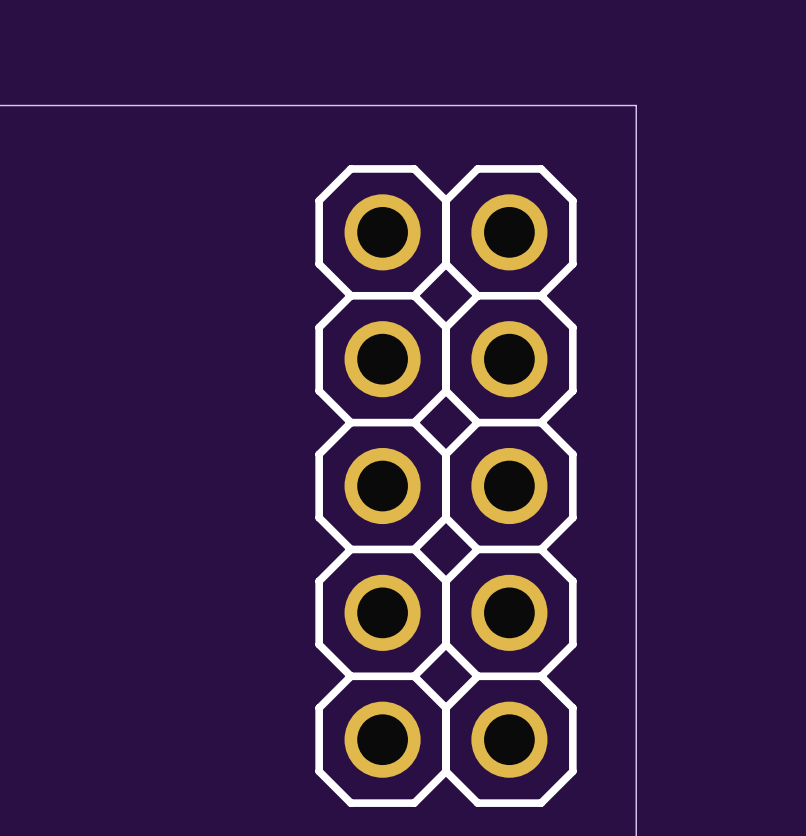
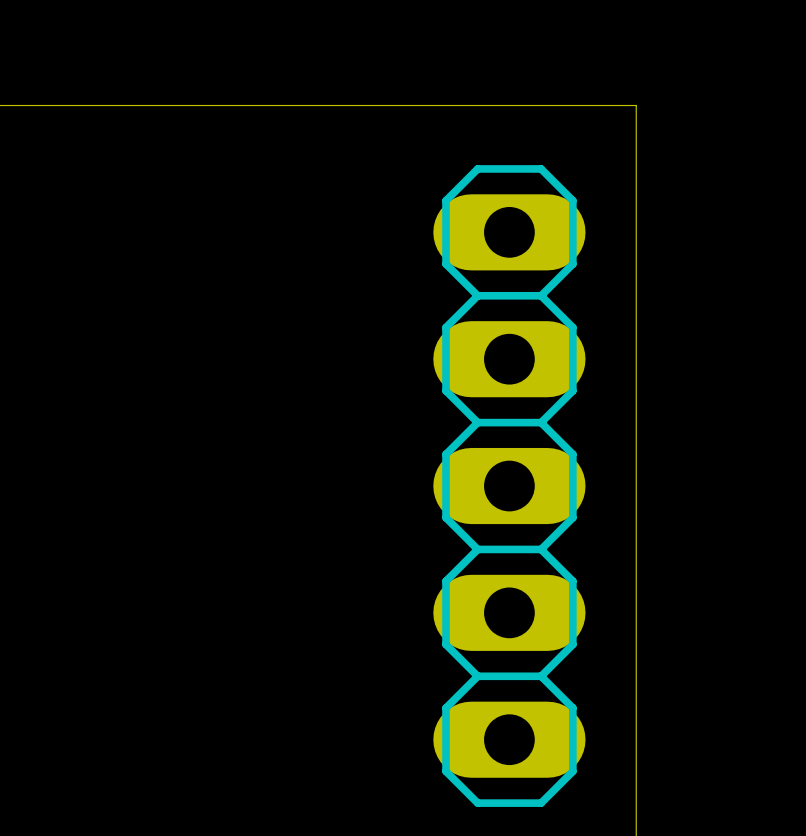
part footprint: [442, 165, 577, 807] -> [433, 165, 586, 807]
part: (382, 486) -> none

